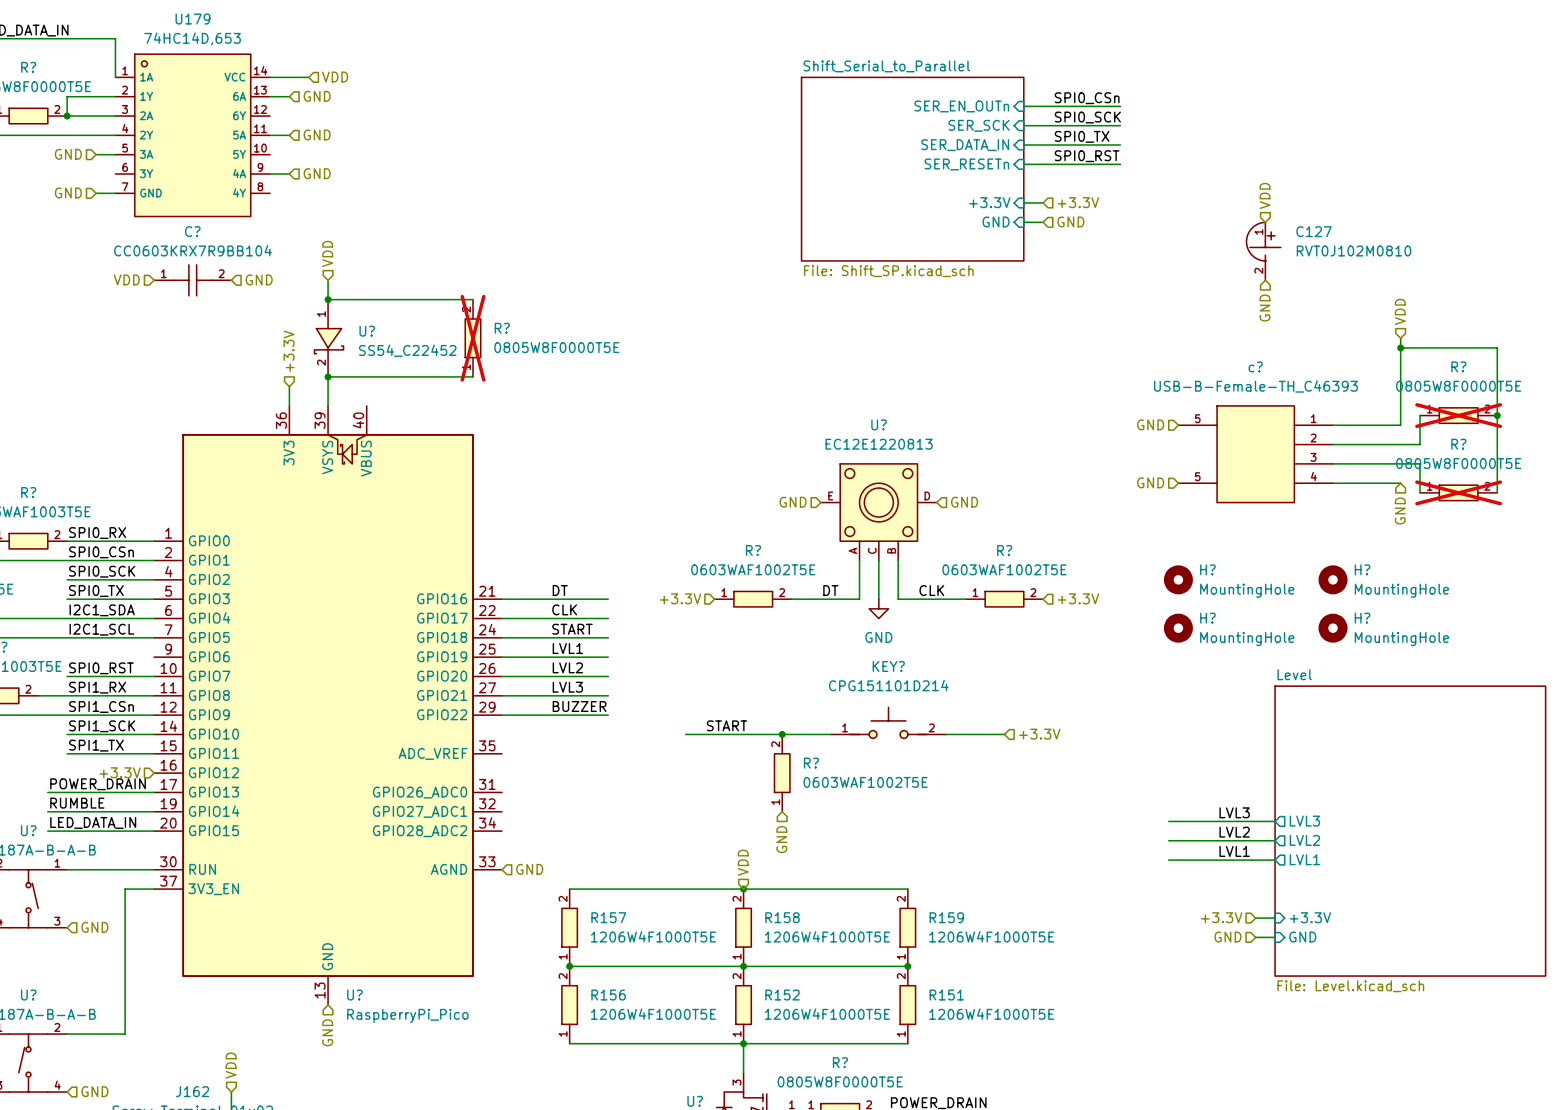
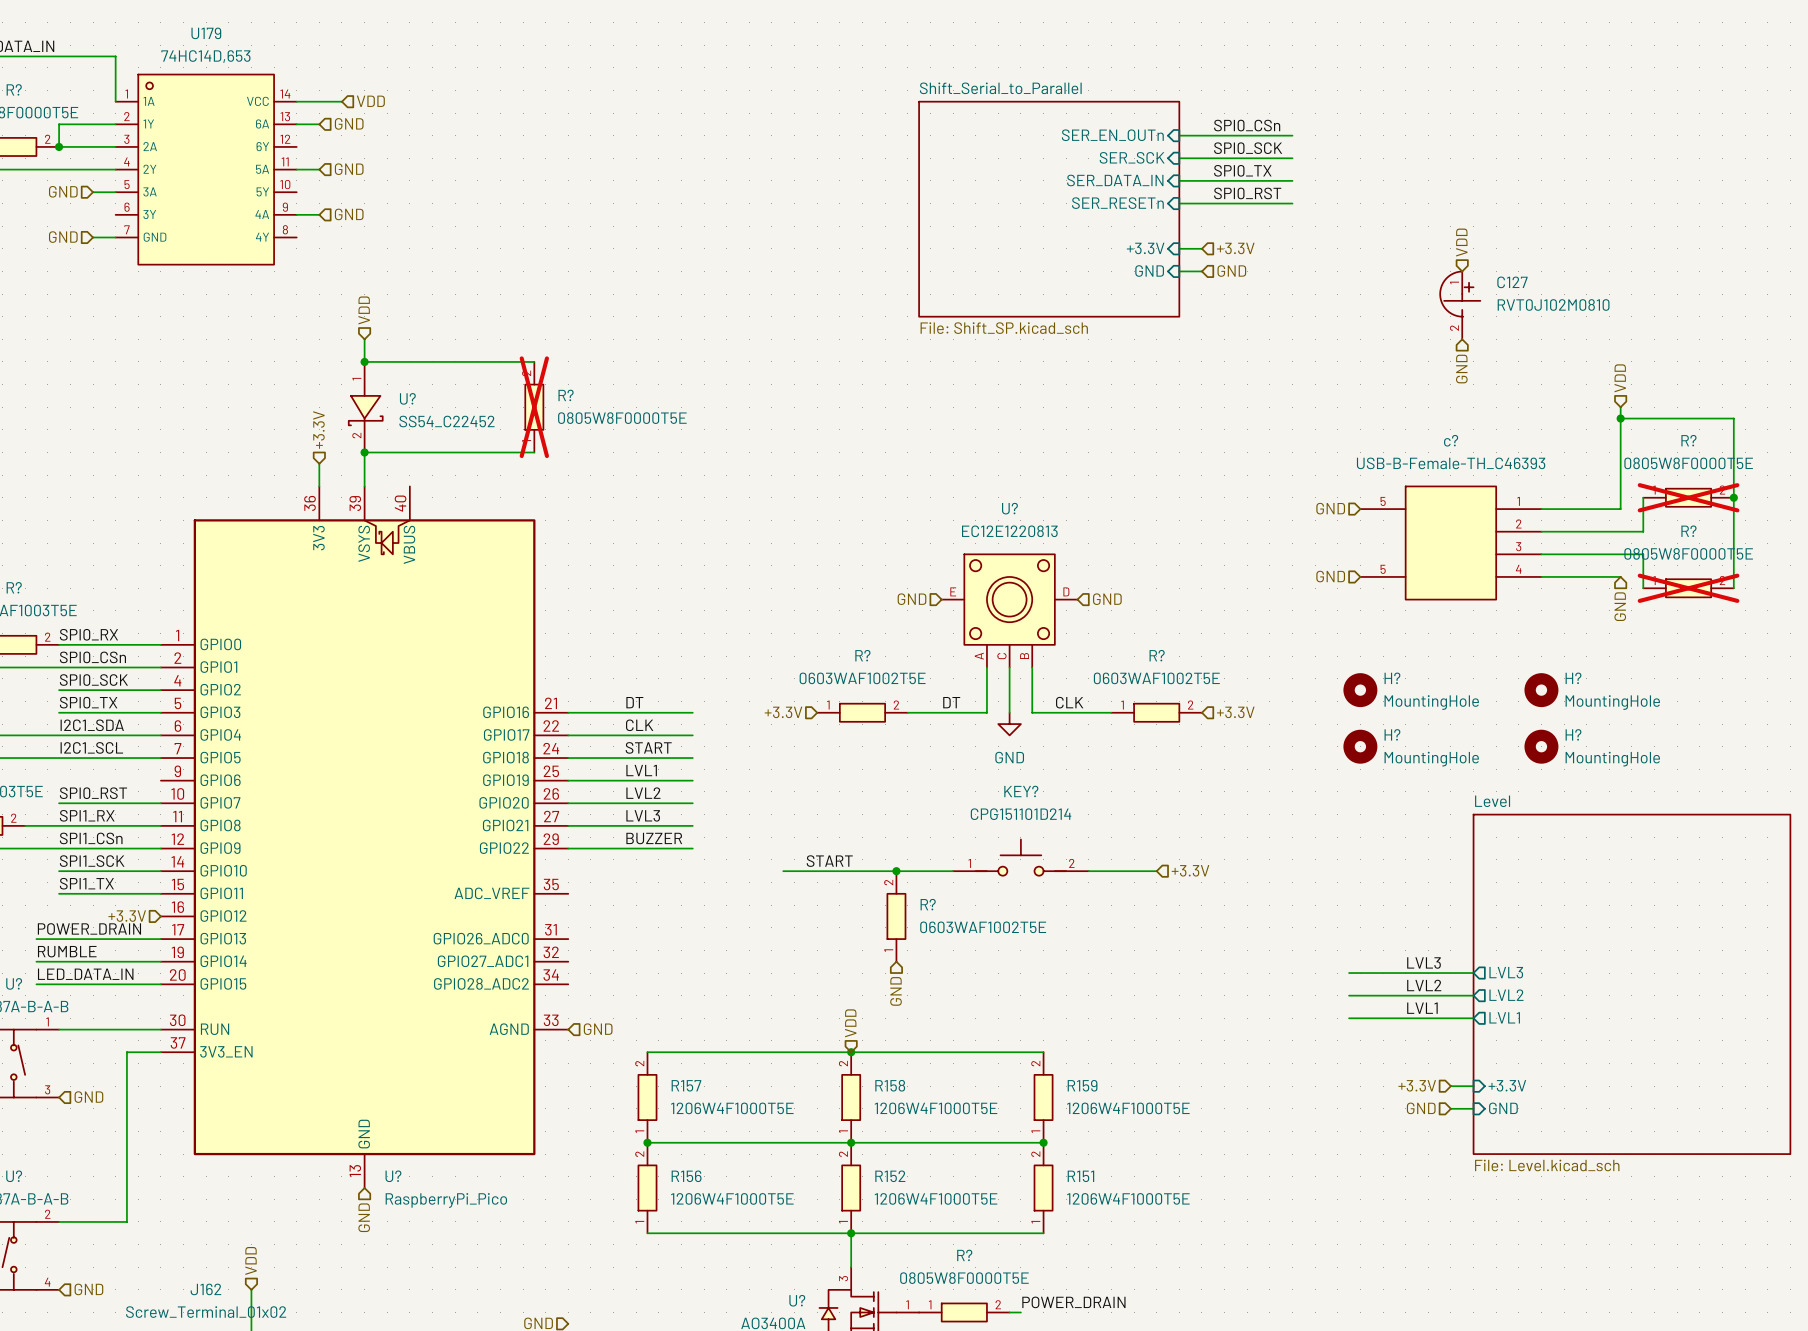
hierarchical label: VDD (126, 279) -> none
hierarchical label: GND (259, 279) -> none
C?: CC0603KRX7R9BB104 (192, 280) -> none

